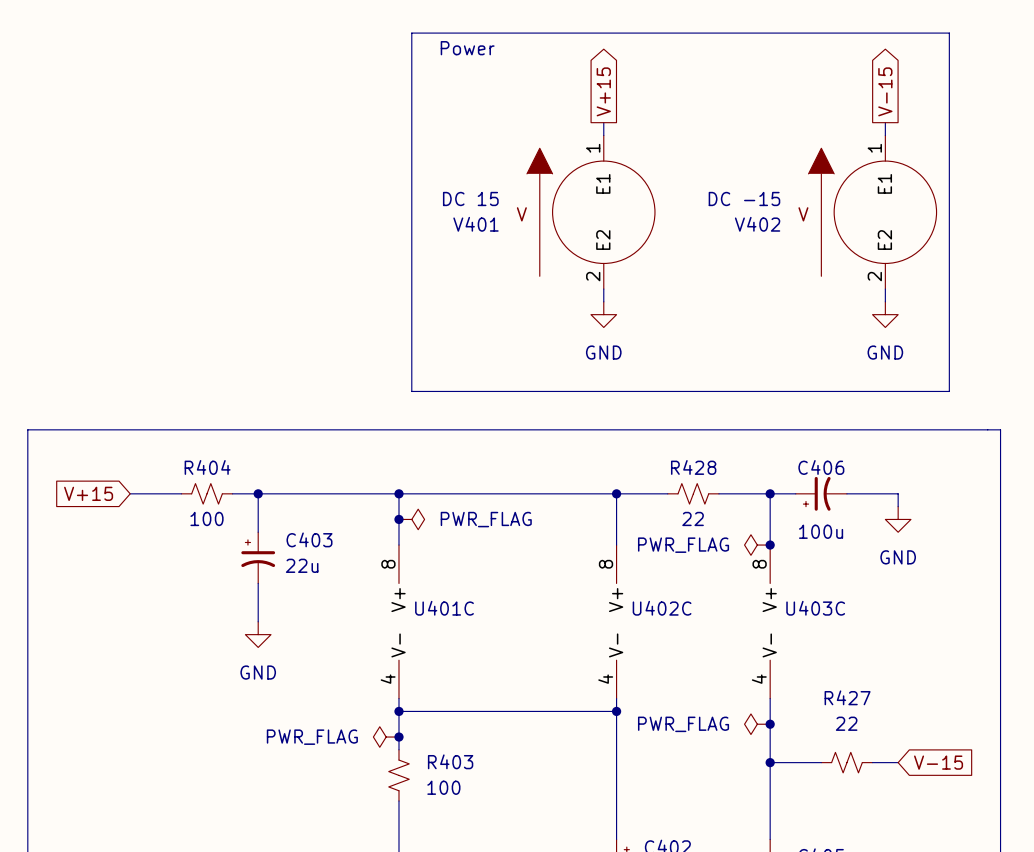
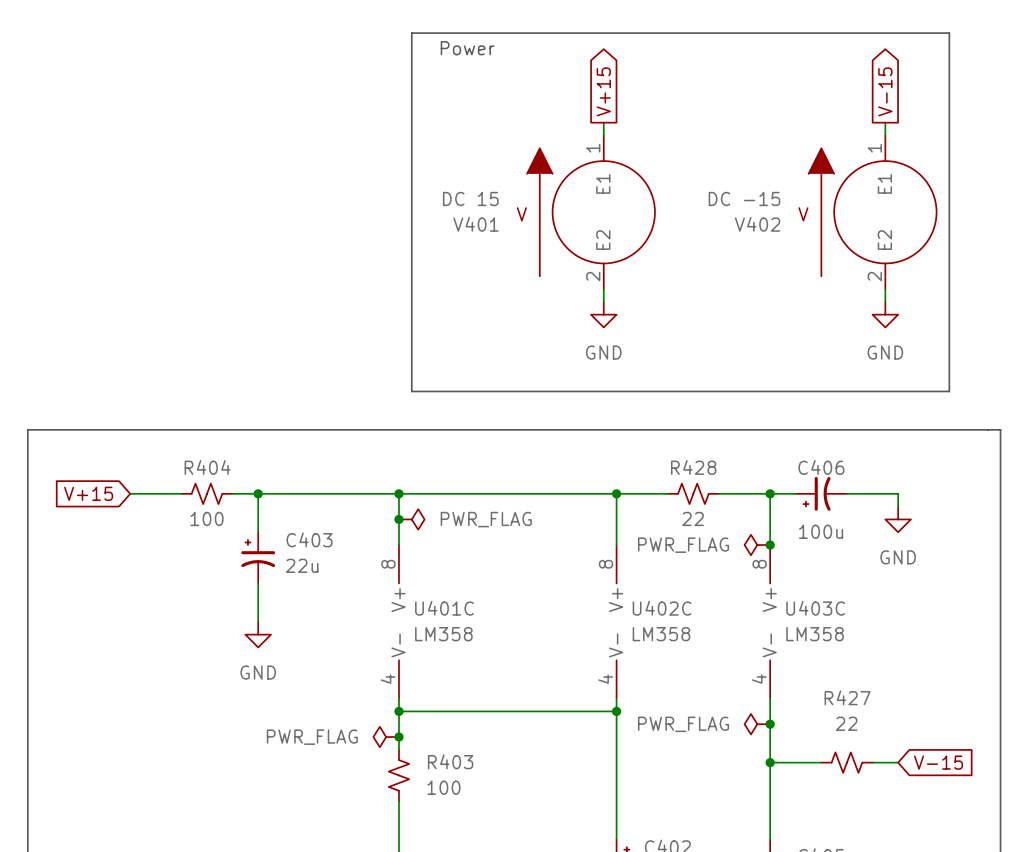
U401C value: none -> LM358 (443, 634)
U402C value: none -> LM358 (661, 634)
U403C value: none -> LM358 (815, 634)

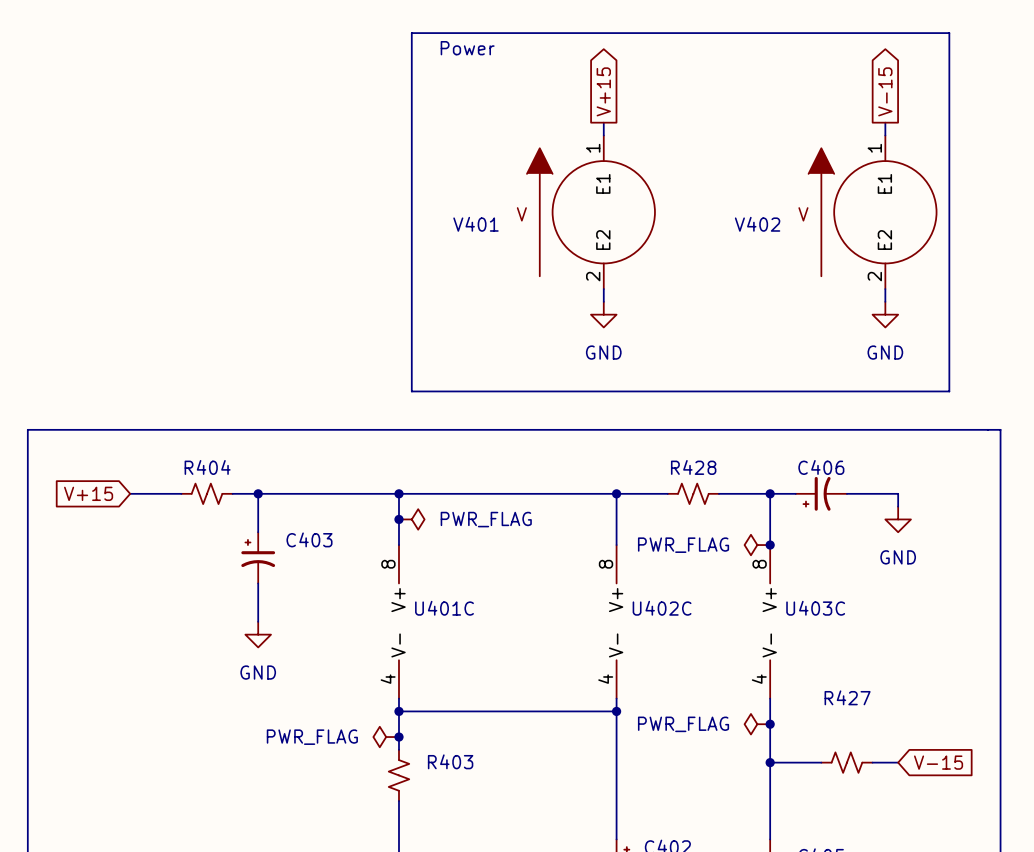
V401 value: DC 15 (470, 198) -> none
V402 value: DC -15 (744, 198) -> none
R404 value: 100 (207, 518) -> none
R428 value: 22 (693, 518) -> none
C406 value: 100u (821, 531) -> none
C403 value: 22u (302, 565) -> none
U401C value: LM358 (443, 634) -> none
U402C value: LM358 (661, 634) -> none
U403C value: LM358 (815, 634) -> none
R427 value: 22 (846, 723) -> none
R403 value: 100 (443, 787) -> none

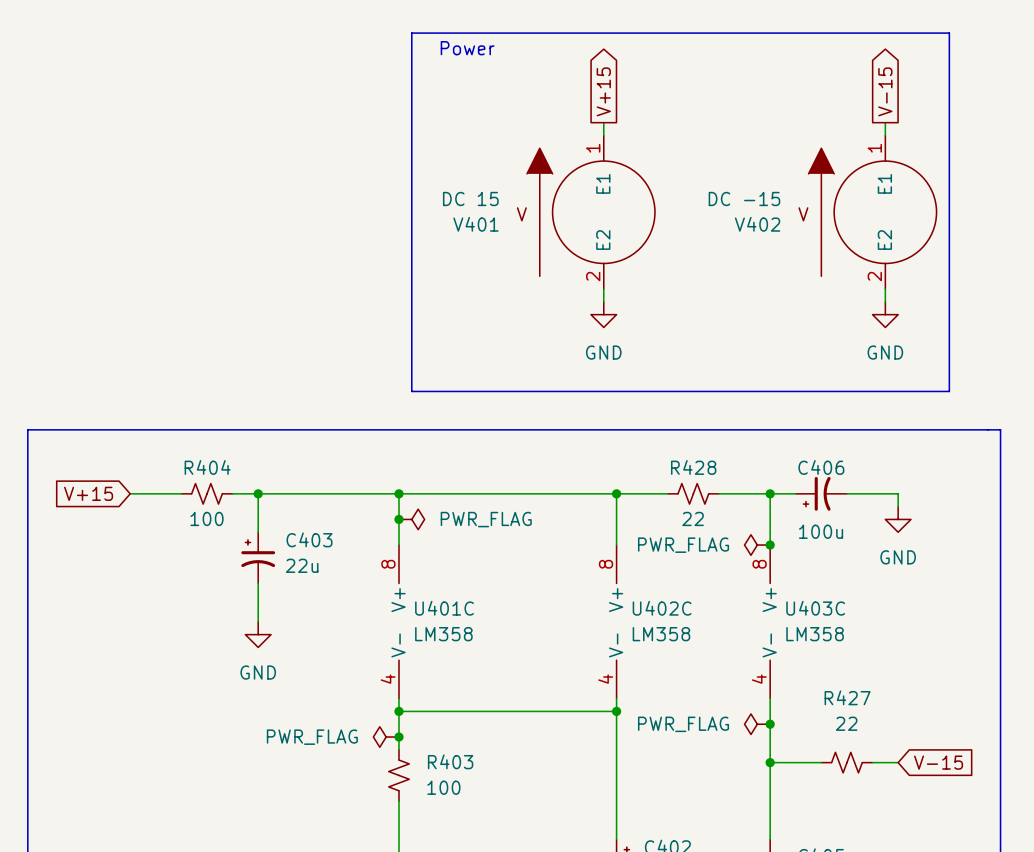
V401 value: none -> DC 15 (470, 198)
V402 value: none -> DC -15 (744, 198)
R404 value: none -> 100 (207, 518)
R428 value: none -> 22 (693, 518)
C406 value: none -> 100u (821, 531)
C403 value: none -> 22u (302, 565)
U401C value: none -> LM358 (443, 634)
U402C value: none -> LM358 (661, 634)
U403C value: none -> LM358 (815, 634)
R427 value: none -> 22 (846, 723)
R403 value: none -> 100 (443, 787)

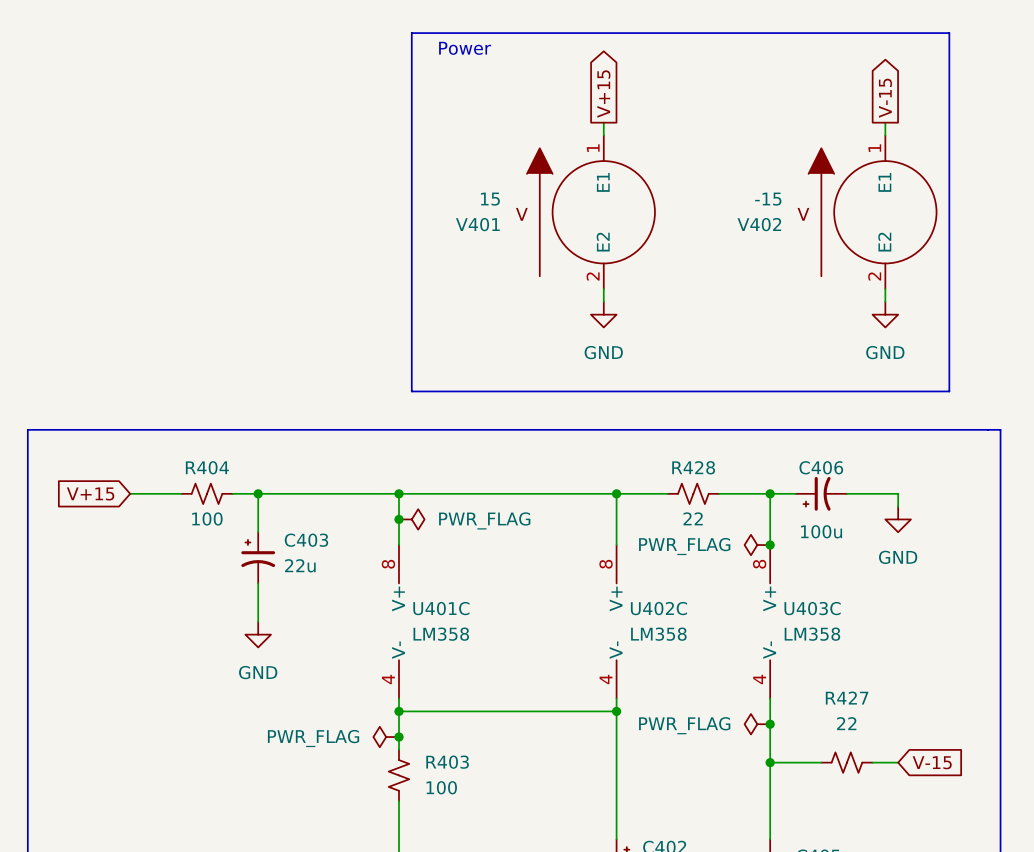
V401 value: DC 15 (470, 198) -> 15 (490, 199)
V402 value: DC -15 (744, 198) -> -15 (768, 199)

